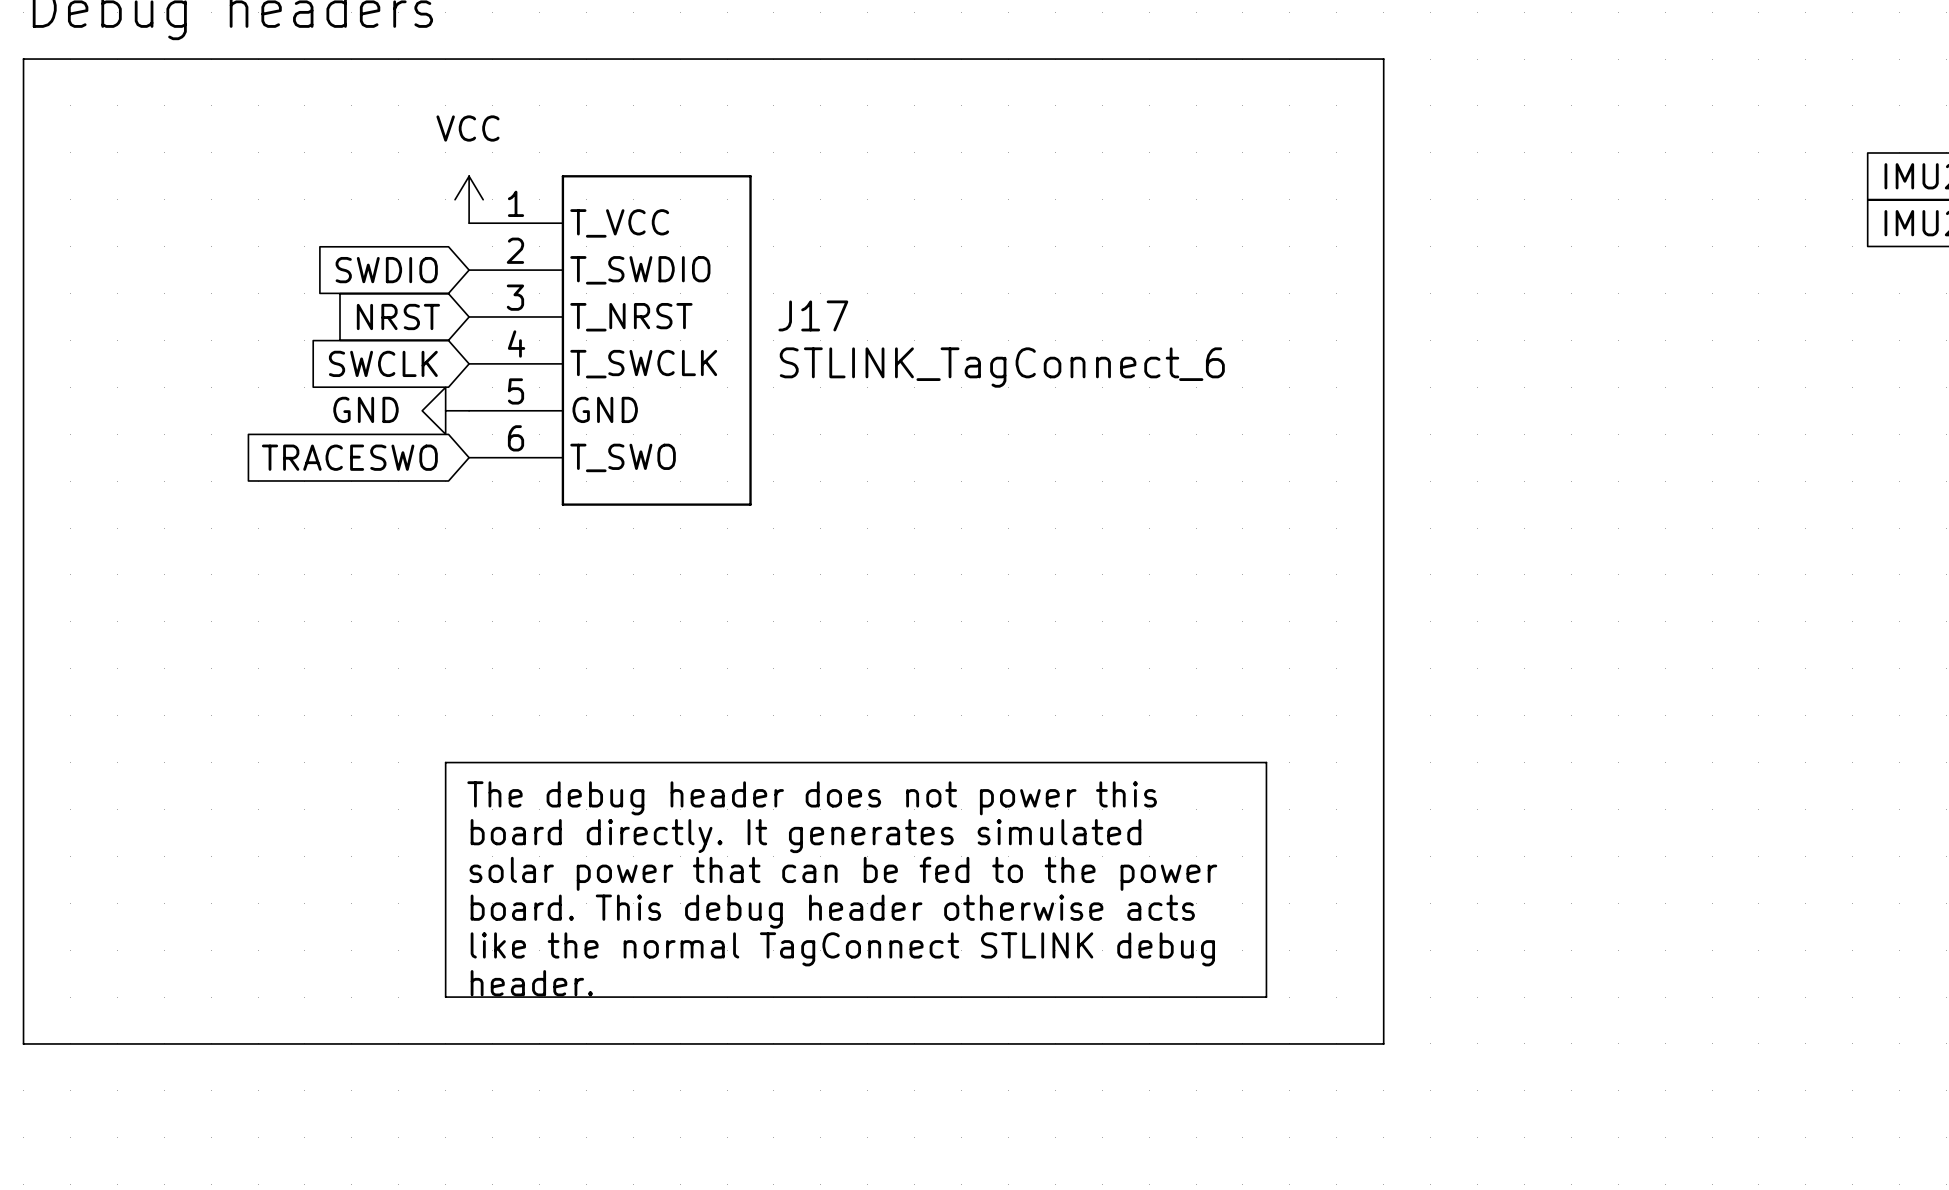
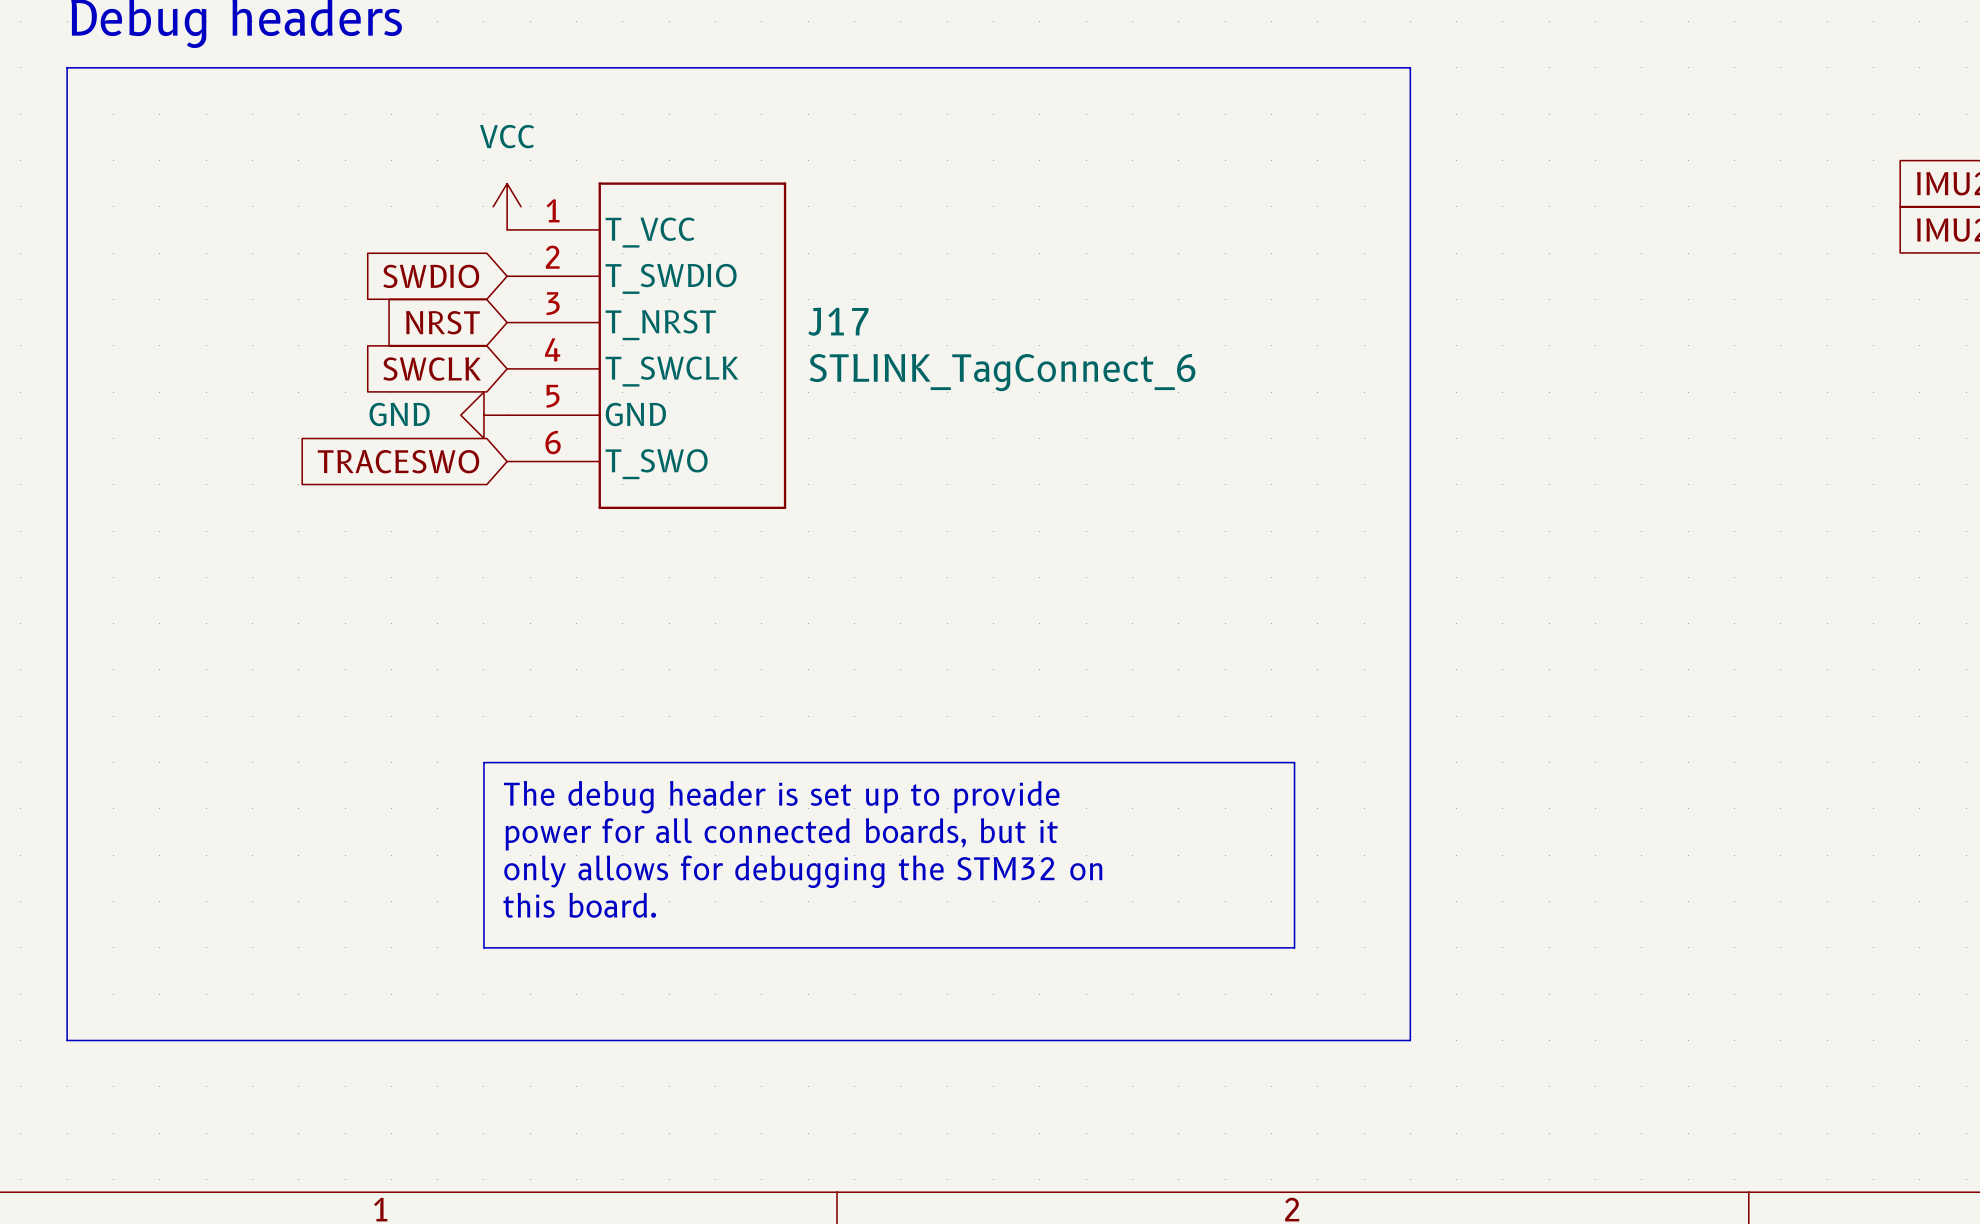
text: The debug header does not power this (812, 798) -> The debug header is set up to provide (781, 797)
text: board directly. It generates simulated (805, 836) -> power for all connected boards, but it (781, 834)
text: solar power that can be fed to the power (843, 873) -> only allows for debugging the STM32 on (803, 871)
text: board. This debug header otherwise acts (832, 911) -> this board. (579, 905)
text: like the normal TagConnect STLINK debug (842, 949) -> none
line: (445, 950) (445, 997) (1266, 997) (1266, 950) -> (483, 947) (1294, 947)
text: header. (531, 983) -> none

